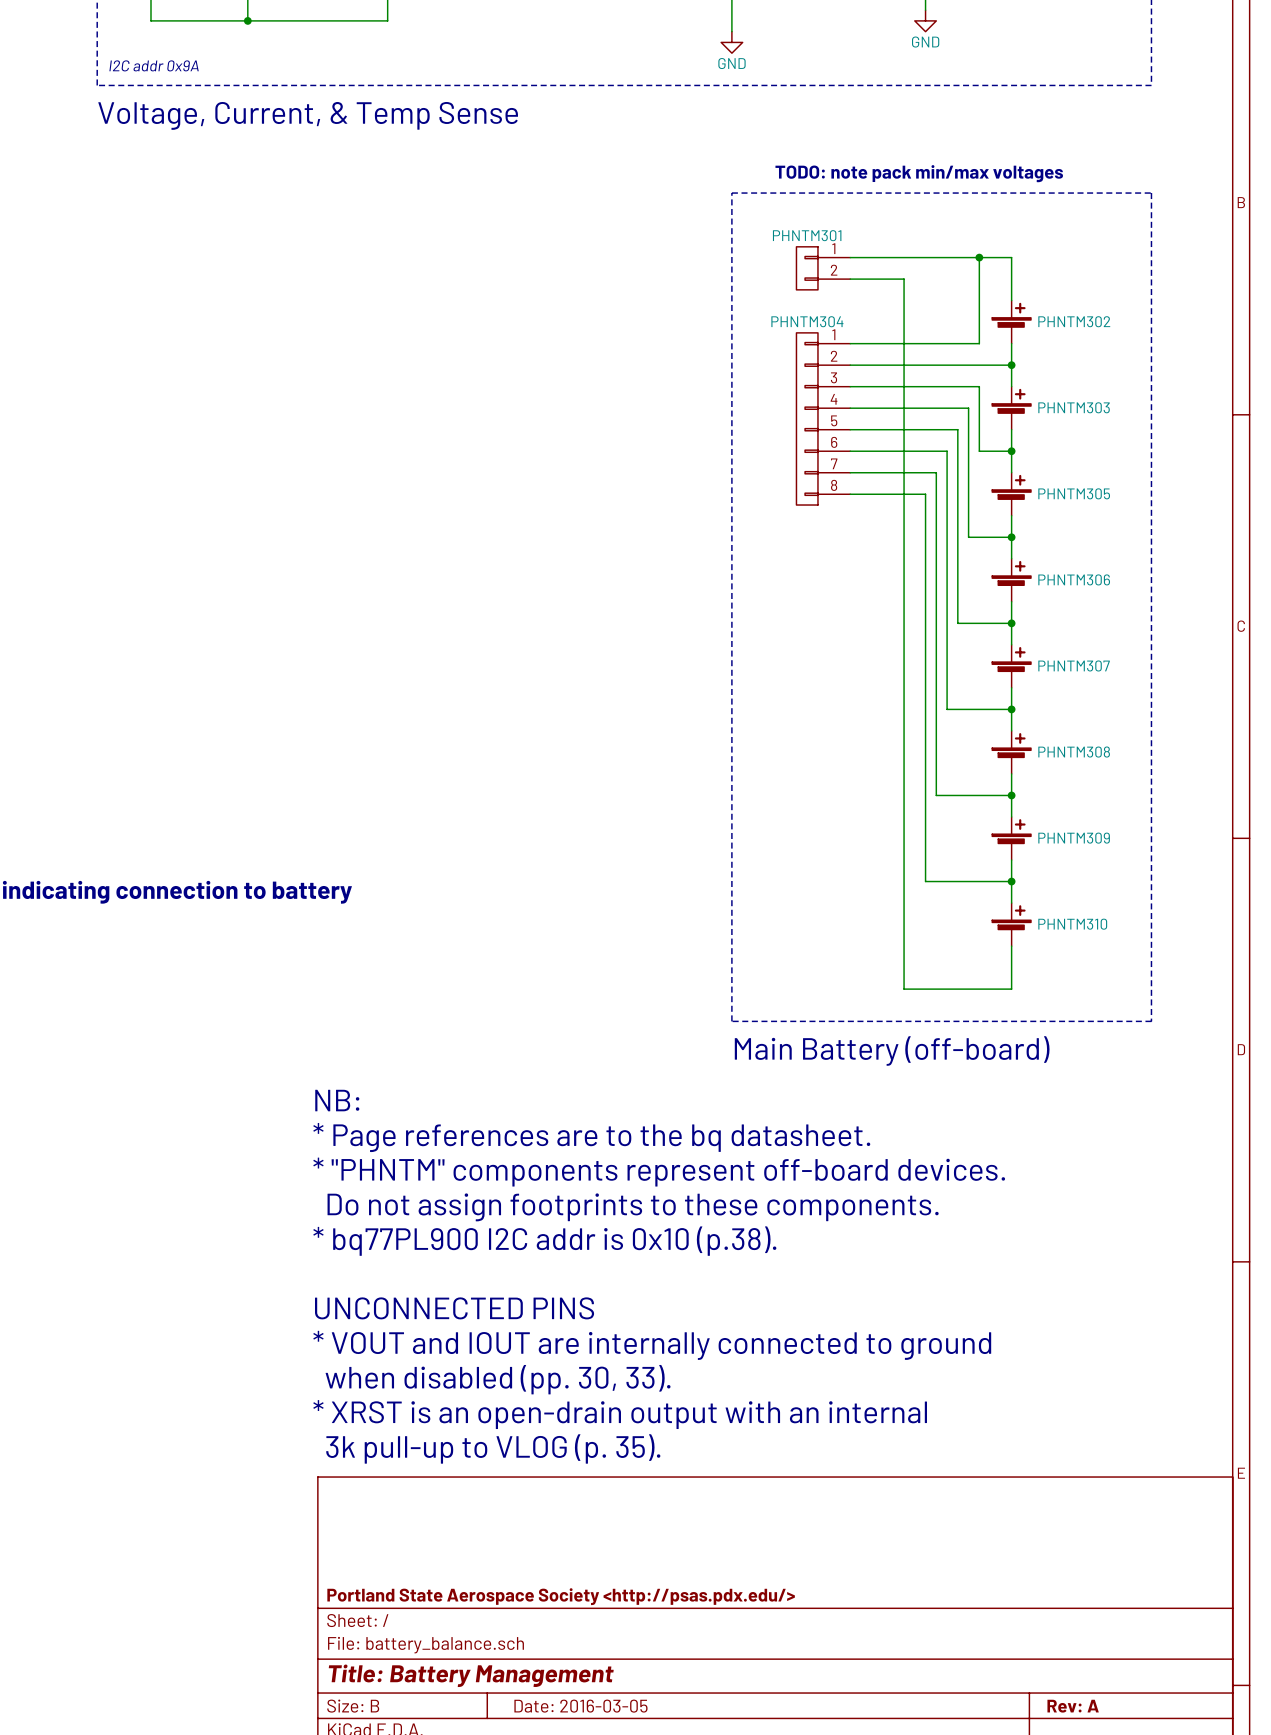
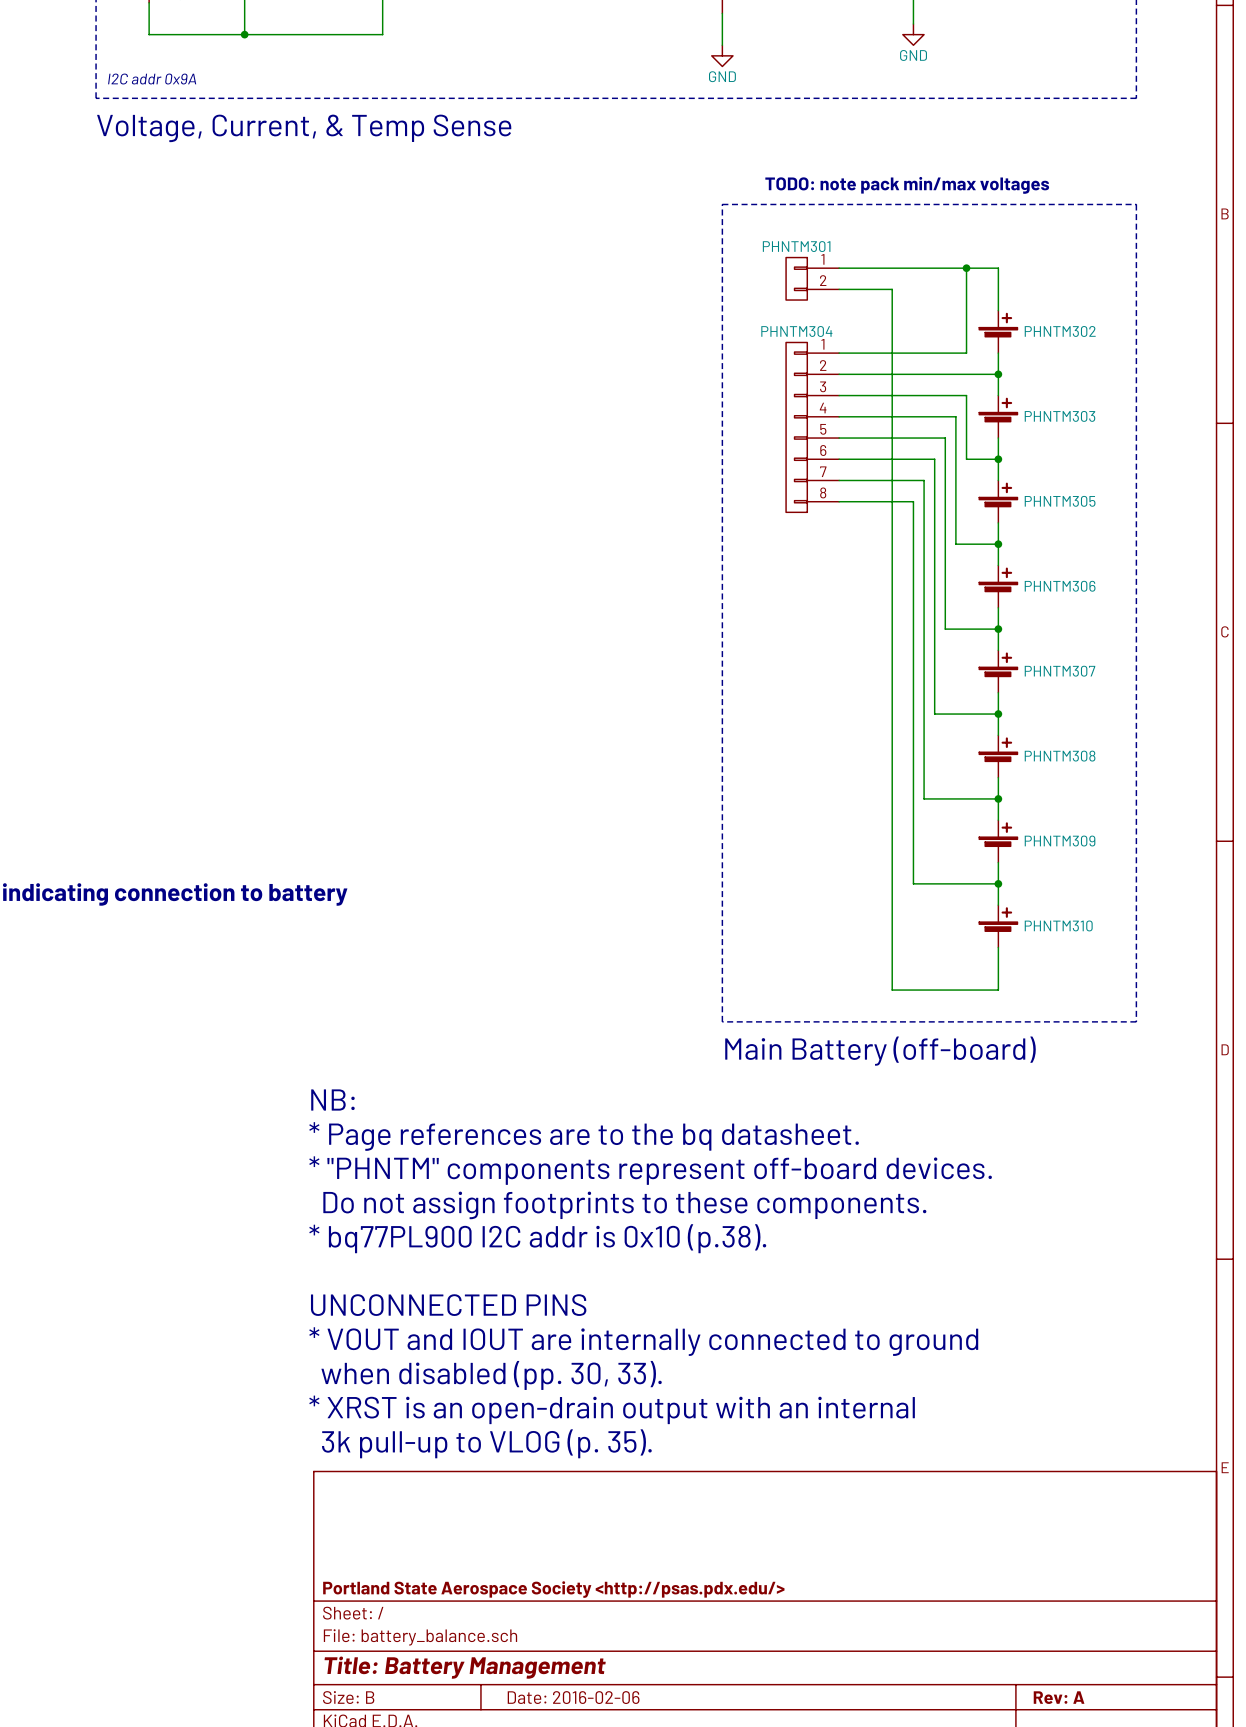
title block: Date: 2016-03-05 (580, 1706) -> Date: 2016-02-06 (573, 1697)

